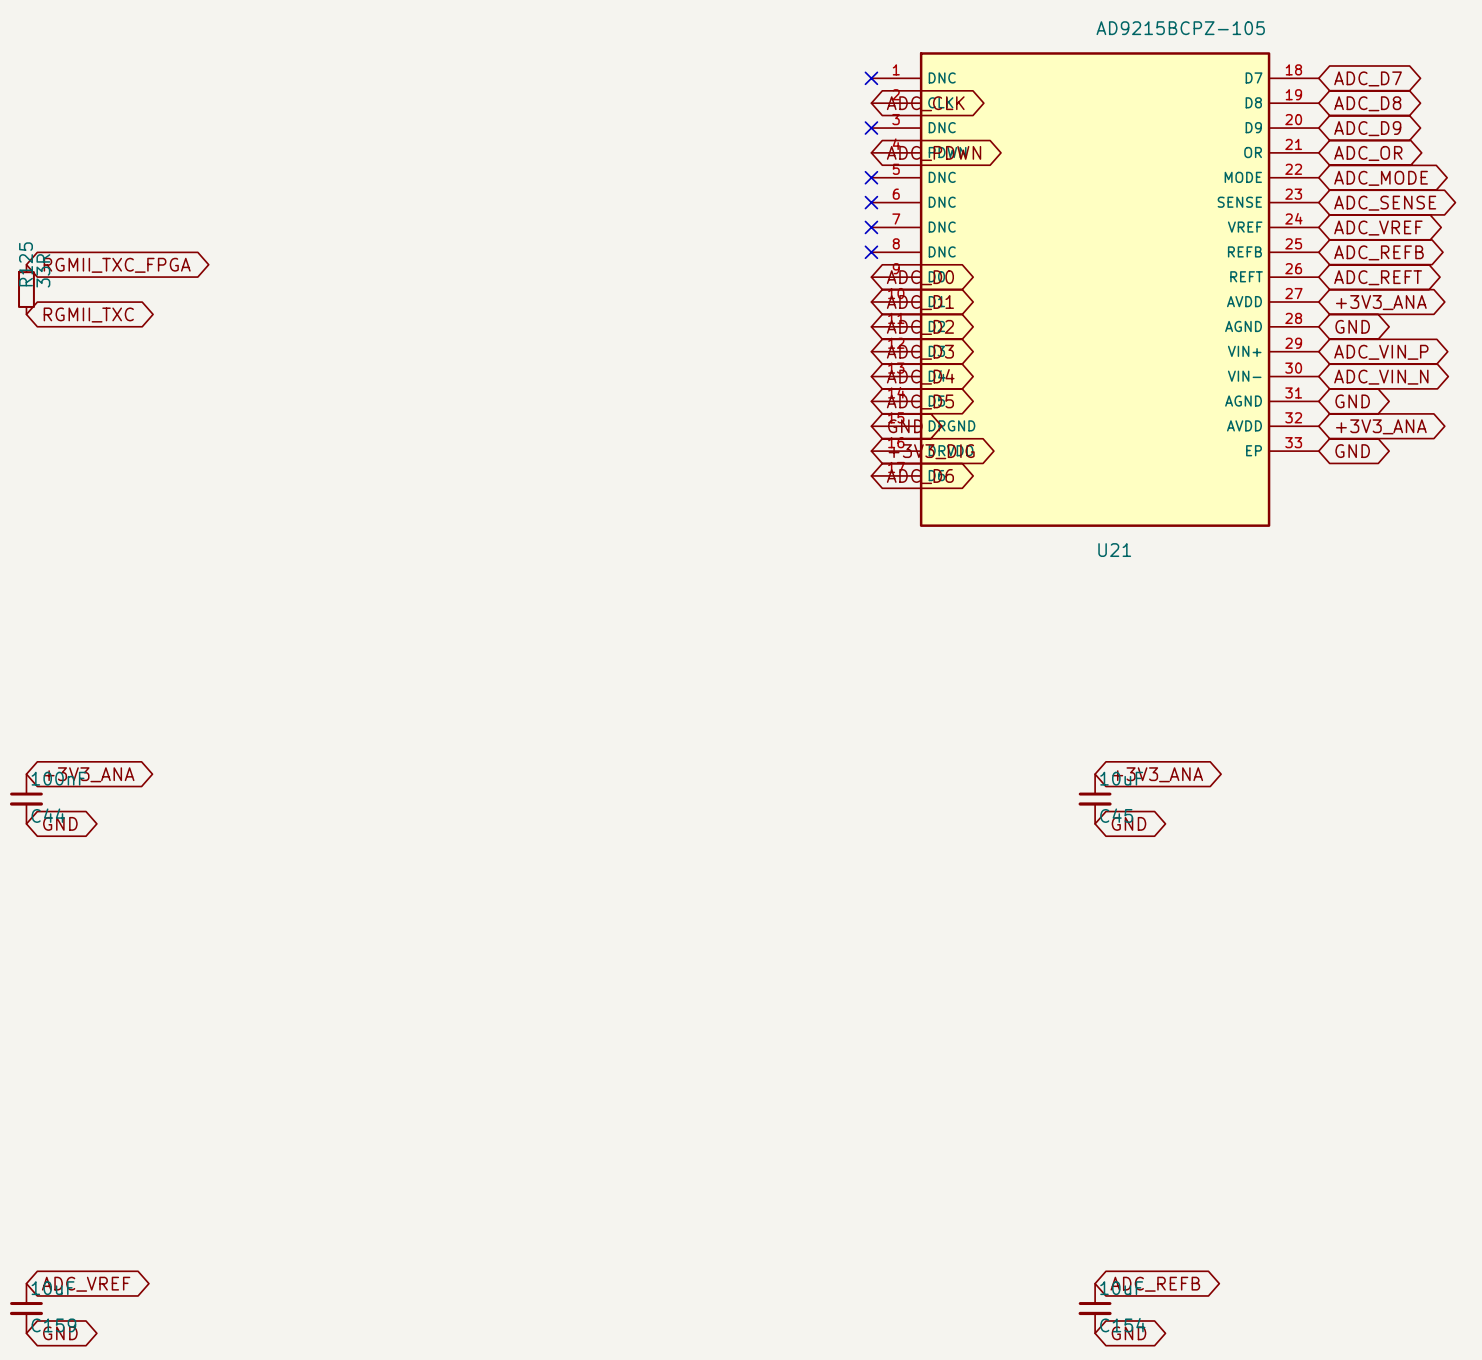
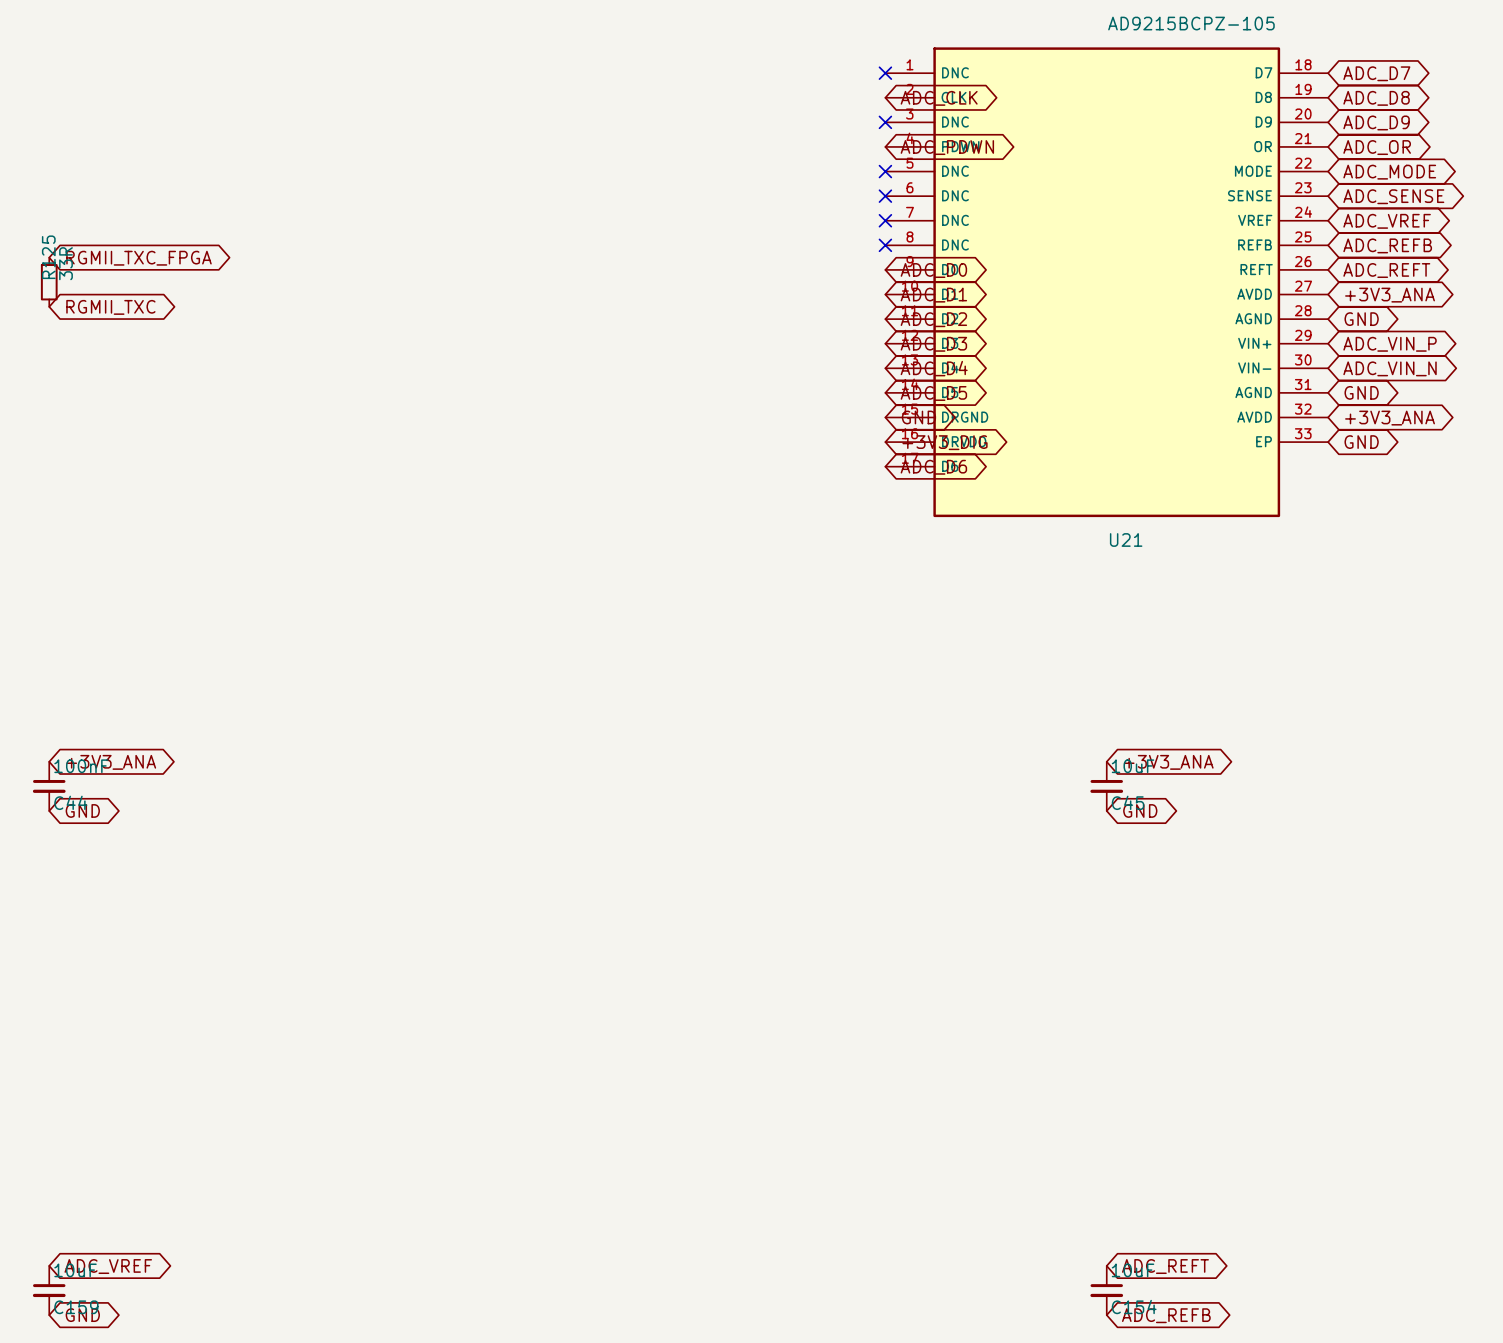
global label: ADC_REFB (1155, 1284) -> ADC_REFT (1165, 1266)
global label: GND (1128, 1333) -> ADC_REFB (1166, 1315)

